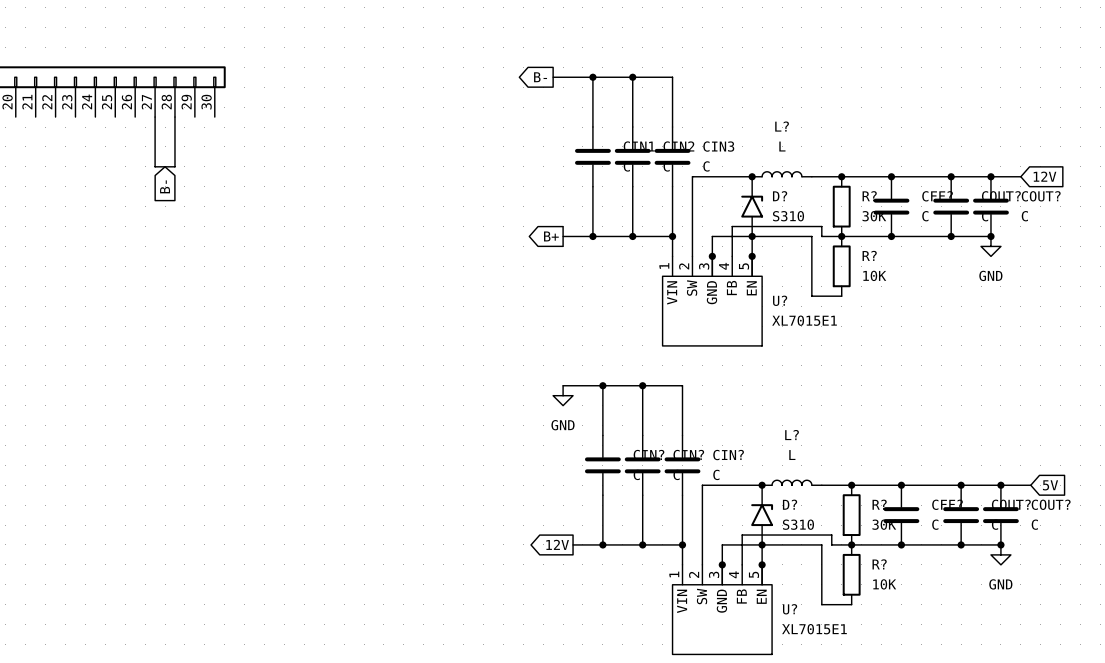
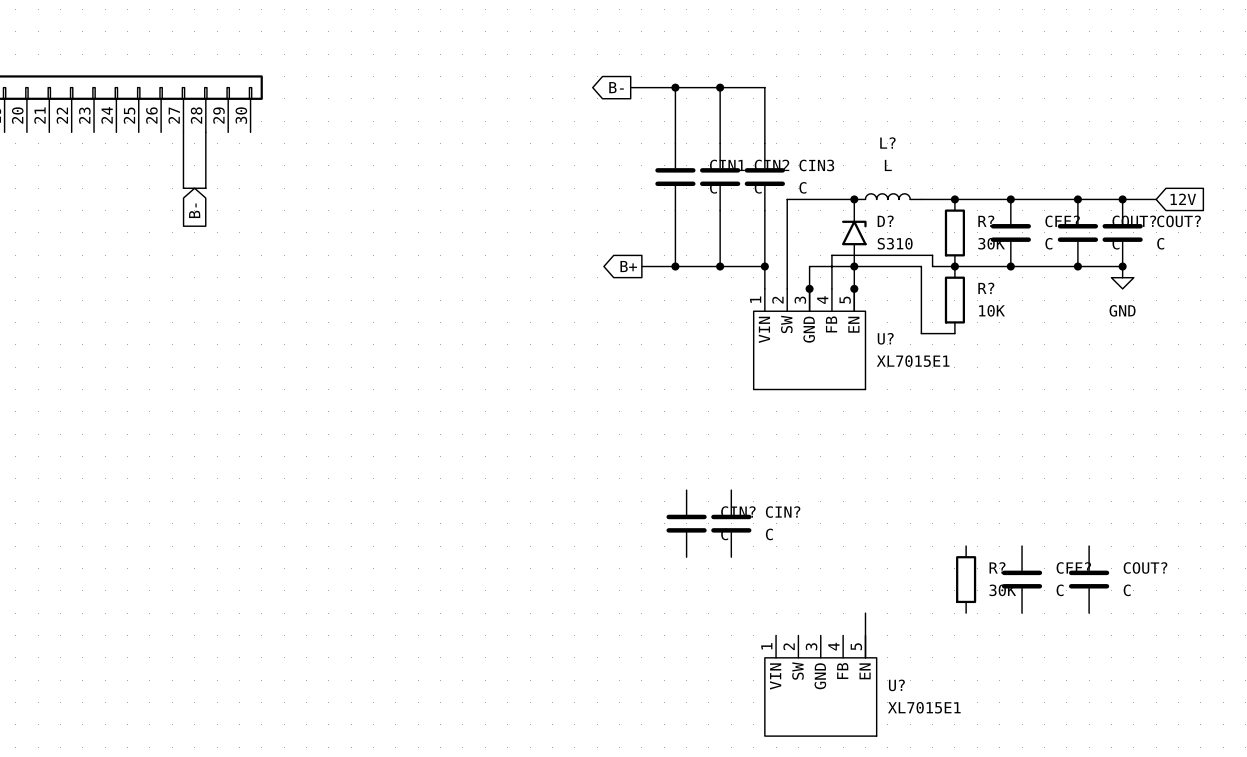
wire: (563, 385) (682, 385) (682, 435) -> none
wire: (602, 385) (602, 435) -> none
junction: (602, 385) -> none
wire: (642, 385) (642, 435) -> none
junction: (642, 385) -> none
power symbol: GND (563, 395) -> none
CIN?: C (682, 465) -> none
L?: L (791, 482) -> none
wire: (762, 485) (702, 485) (702, 564) -> none
junction: (762, 485) -> none
wire: (821, 485) (1030, 485) -> none
junction: (851, 485) -> none
junction: (901, 485) -> none
junction: (961, 485) -> none
junction: (1000, 485) -> none
global label: 5V (1050, 485) -> none
wire: (602, 495) (602, 544) -> none
wire: (642, 495) (642, 544) -> none
wire: (682, 495) (682, 564) -> none
D?: S310 (762, 515) -> none
COUT?: C (1000, 515) -> none
global label: 12V (557, 544) -> none
wire: (573, 544) (682, 544) -> none
junction: (602, 544) -> none
junction: (642, 544) -> none
junction: (682, 544) -> none
junction: (762, 544) -> none
junction: (851, 544) -> none
junction: (901, 544) -> none
junction: (961, 544) -> none
wire: (1000, 544) (831, 544) (831, 535) (742, 535) (742, 564) -> none
junction: (1000, 544) -> none
power symbol: GND (1000, 554) -> none
junction: (722, 564) -> none
junction: (762, 564) -> none
R?: 10K (851, 574) -> none
wire: (722, 584) (722, 544) (821, 544) (821, 604) (851, 604) -> none

